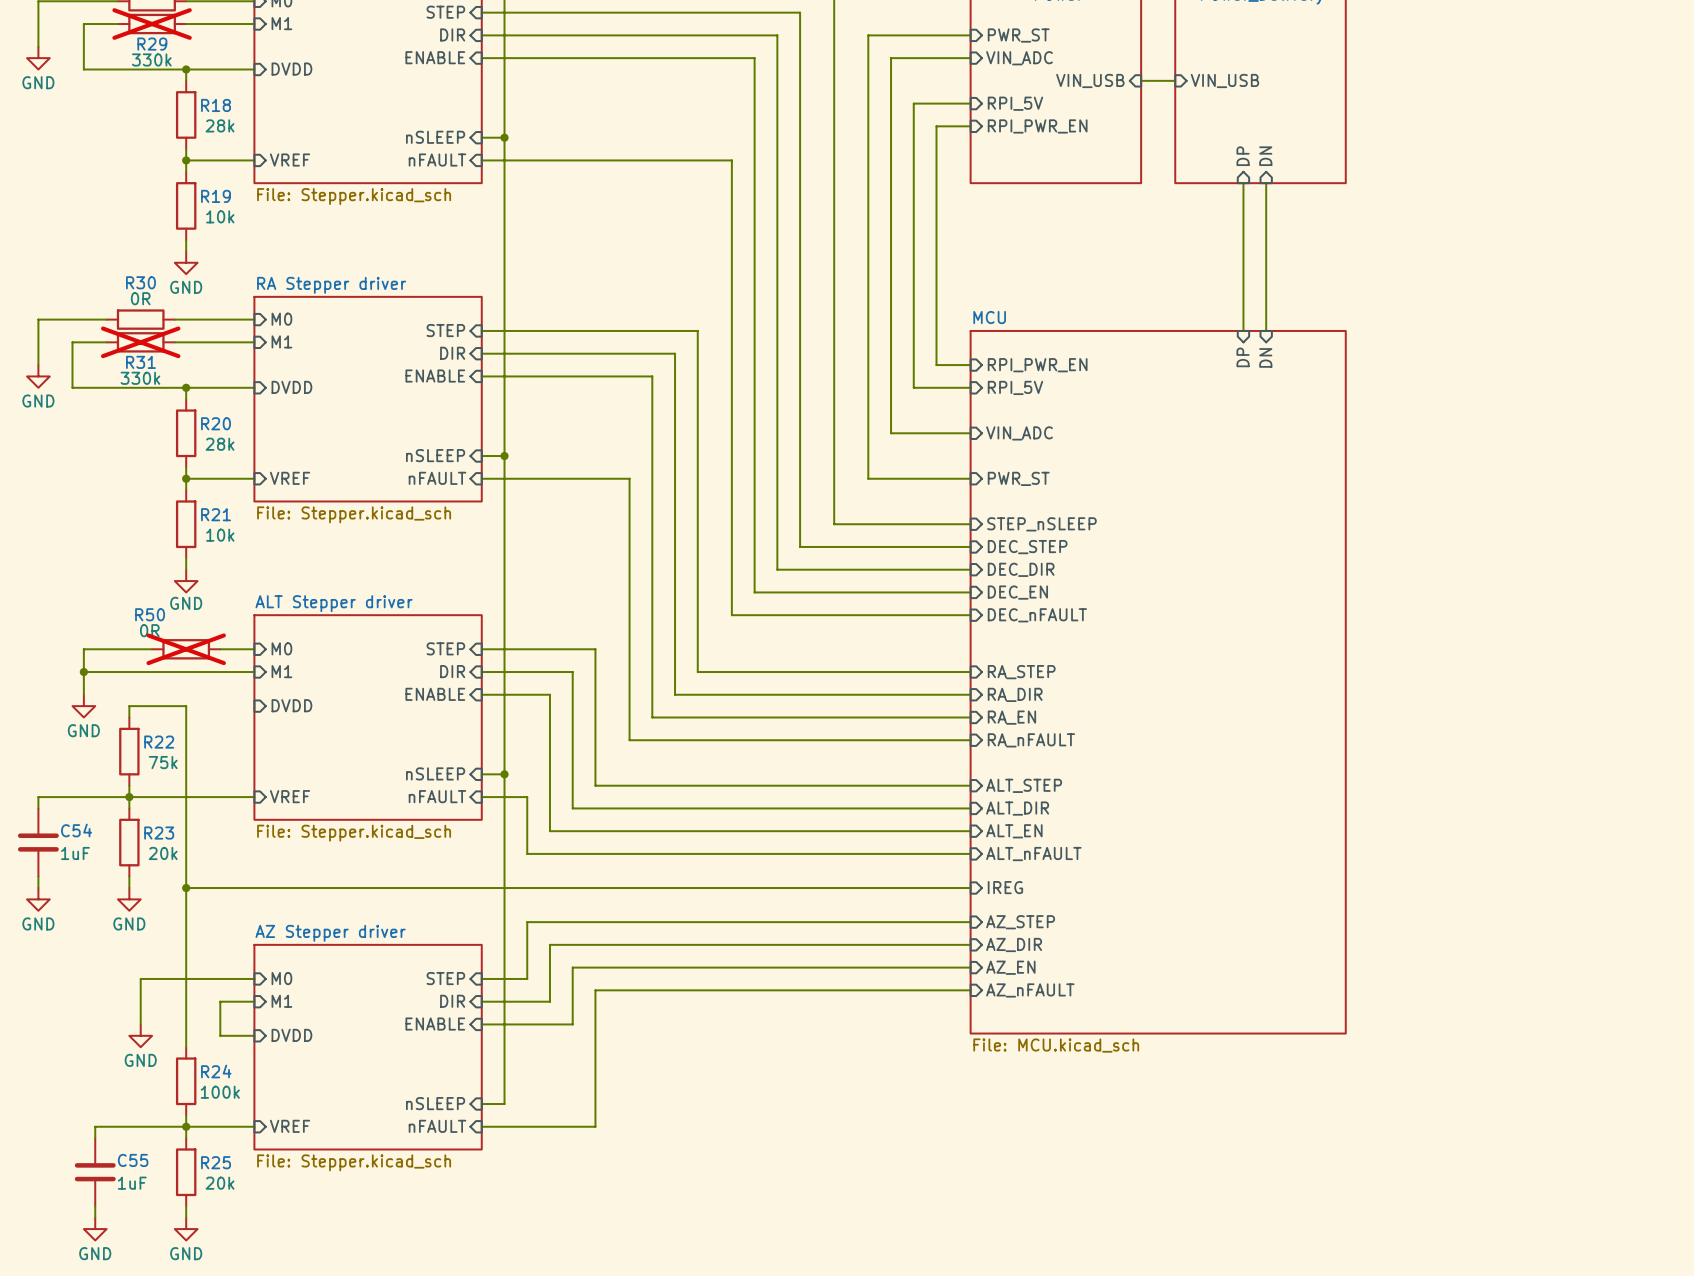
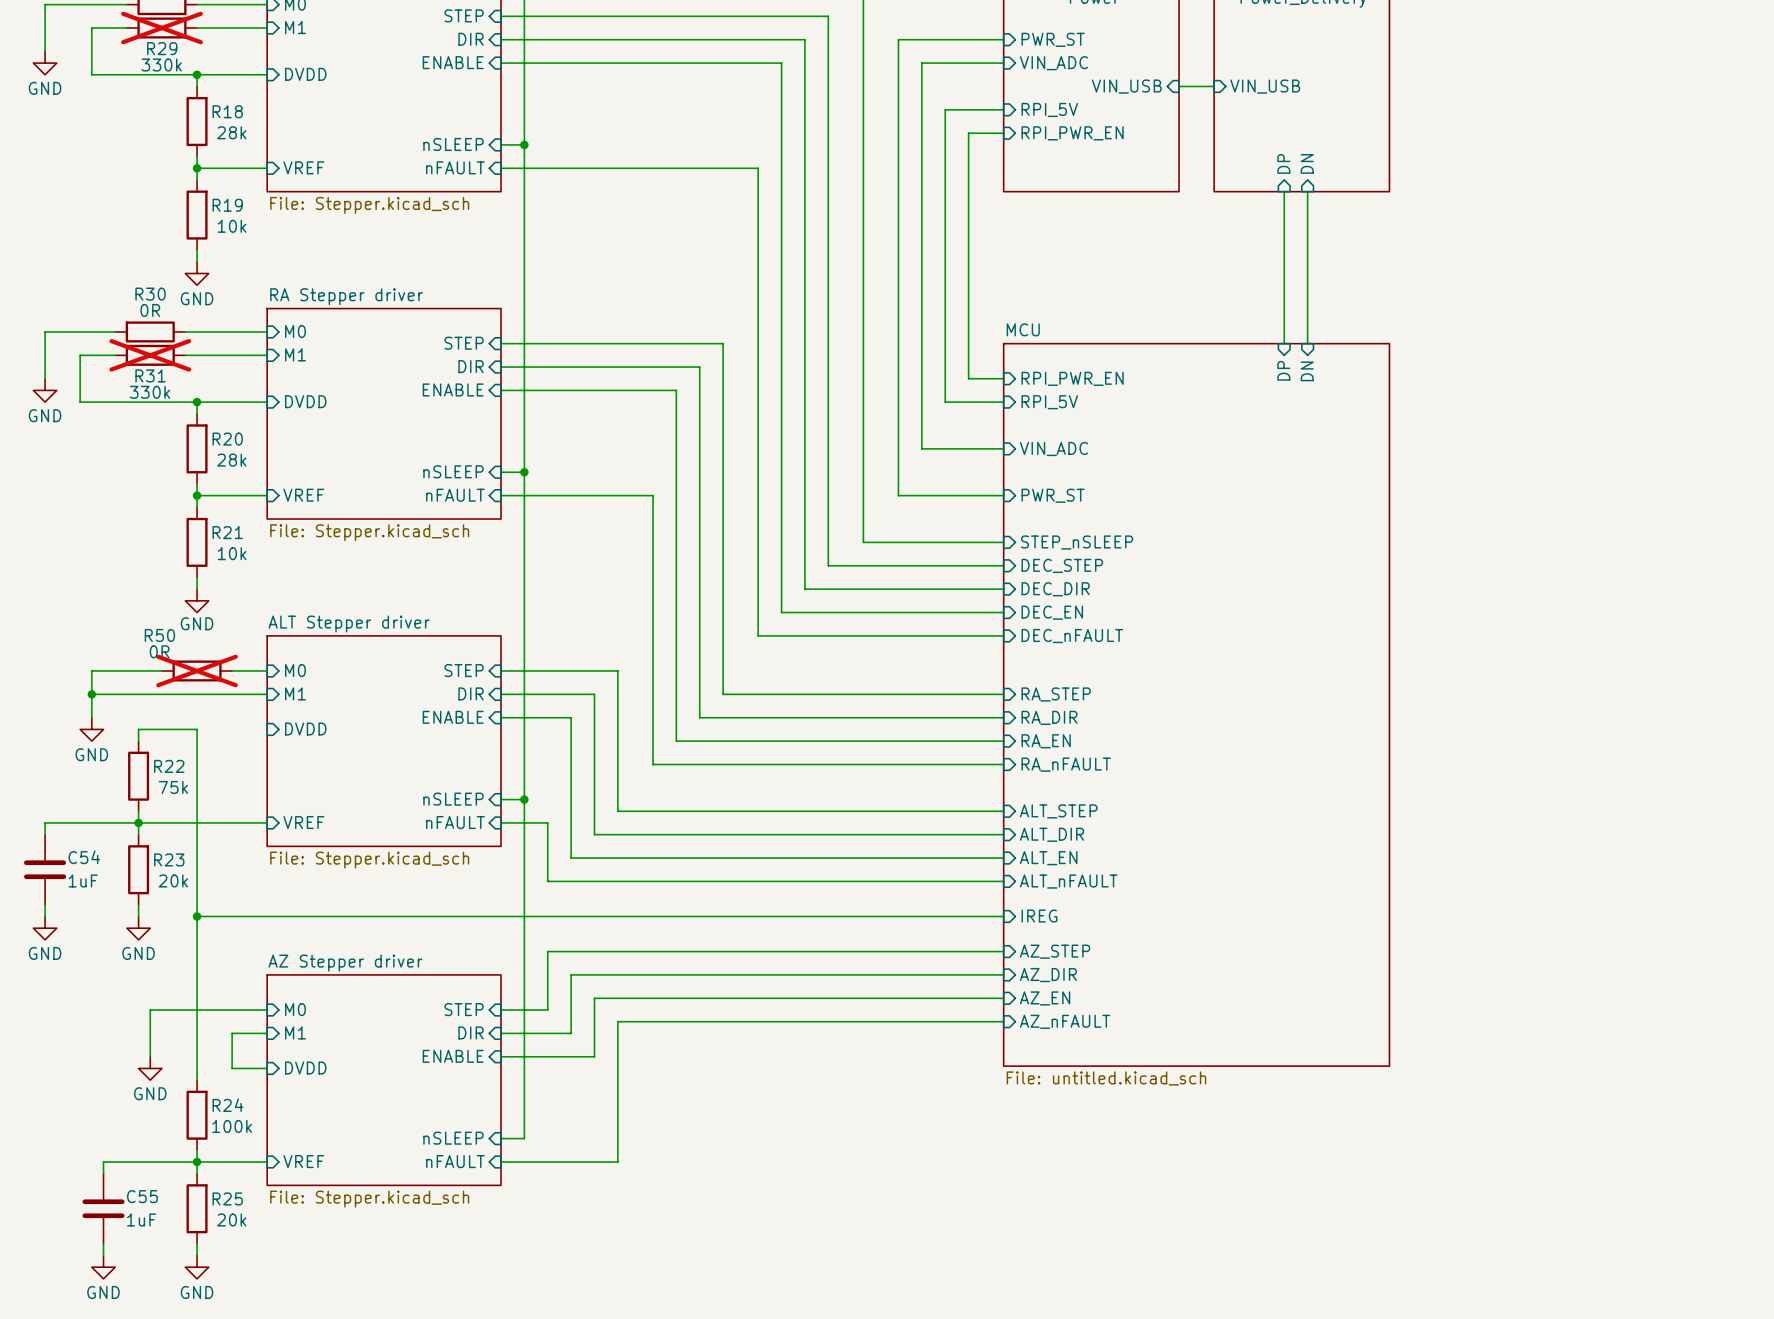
sheet MCU value: File: MCU.kicad_sch (1056, 1045) -> File: untitled.kicad_sch (1106, 1078)

